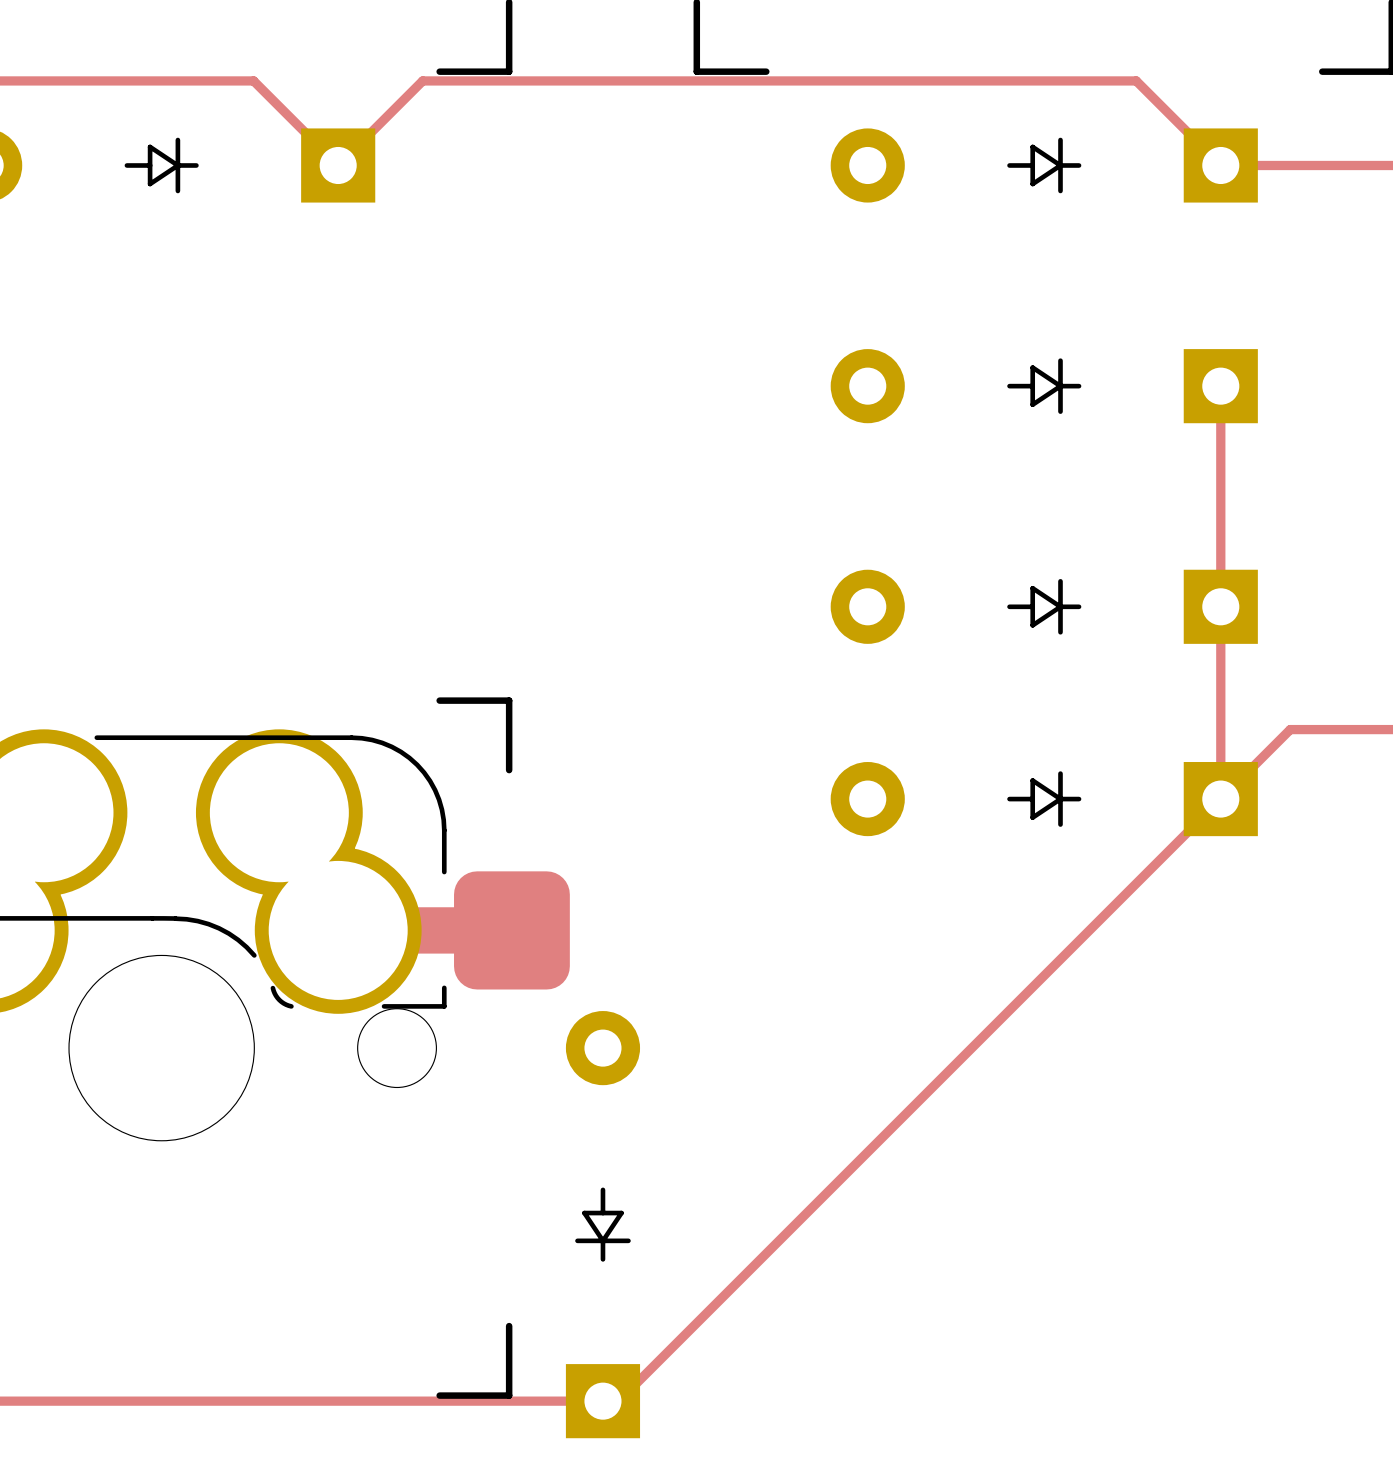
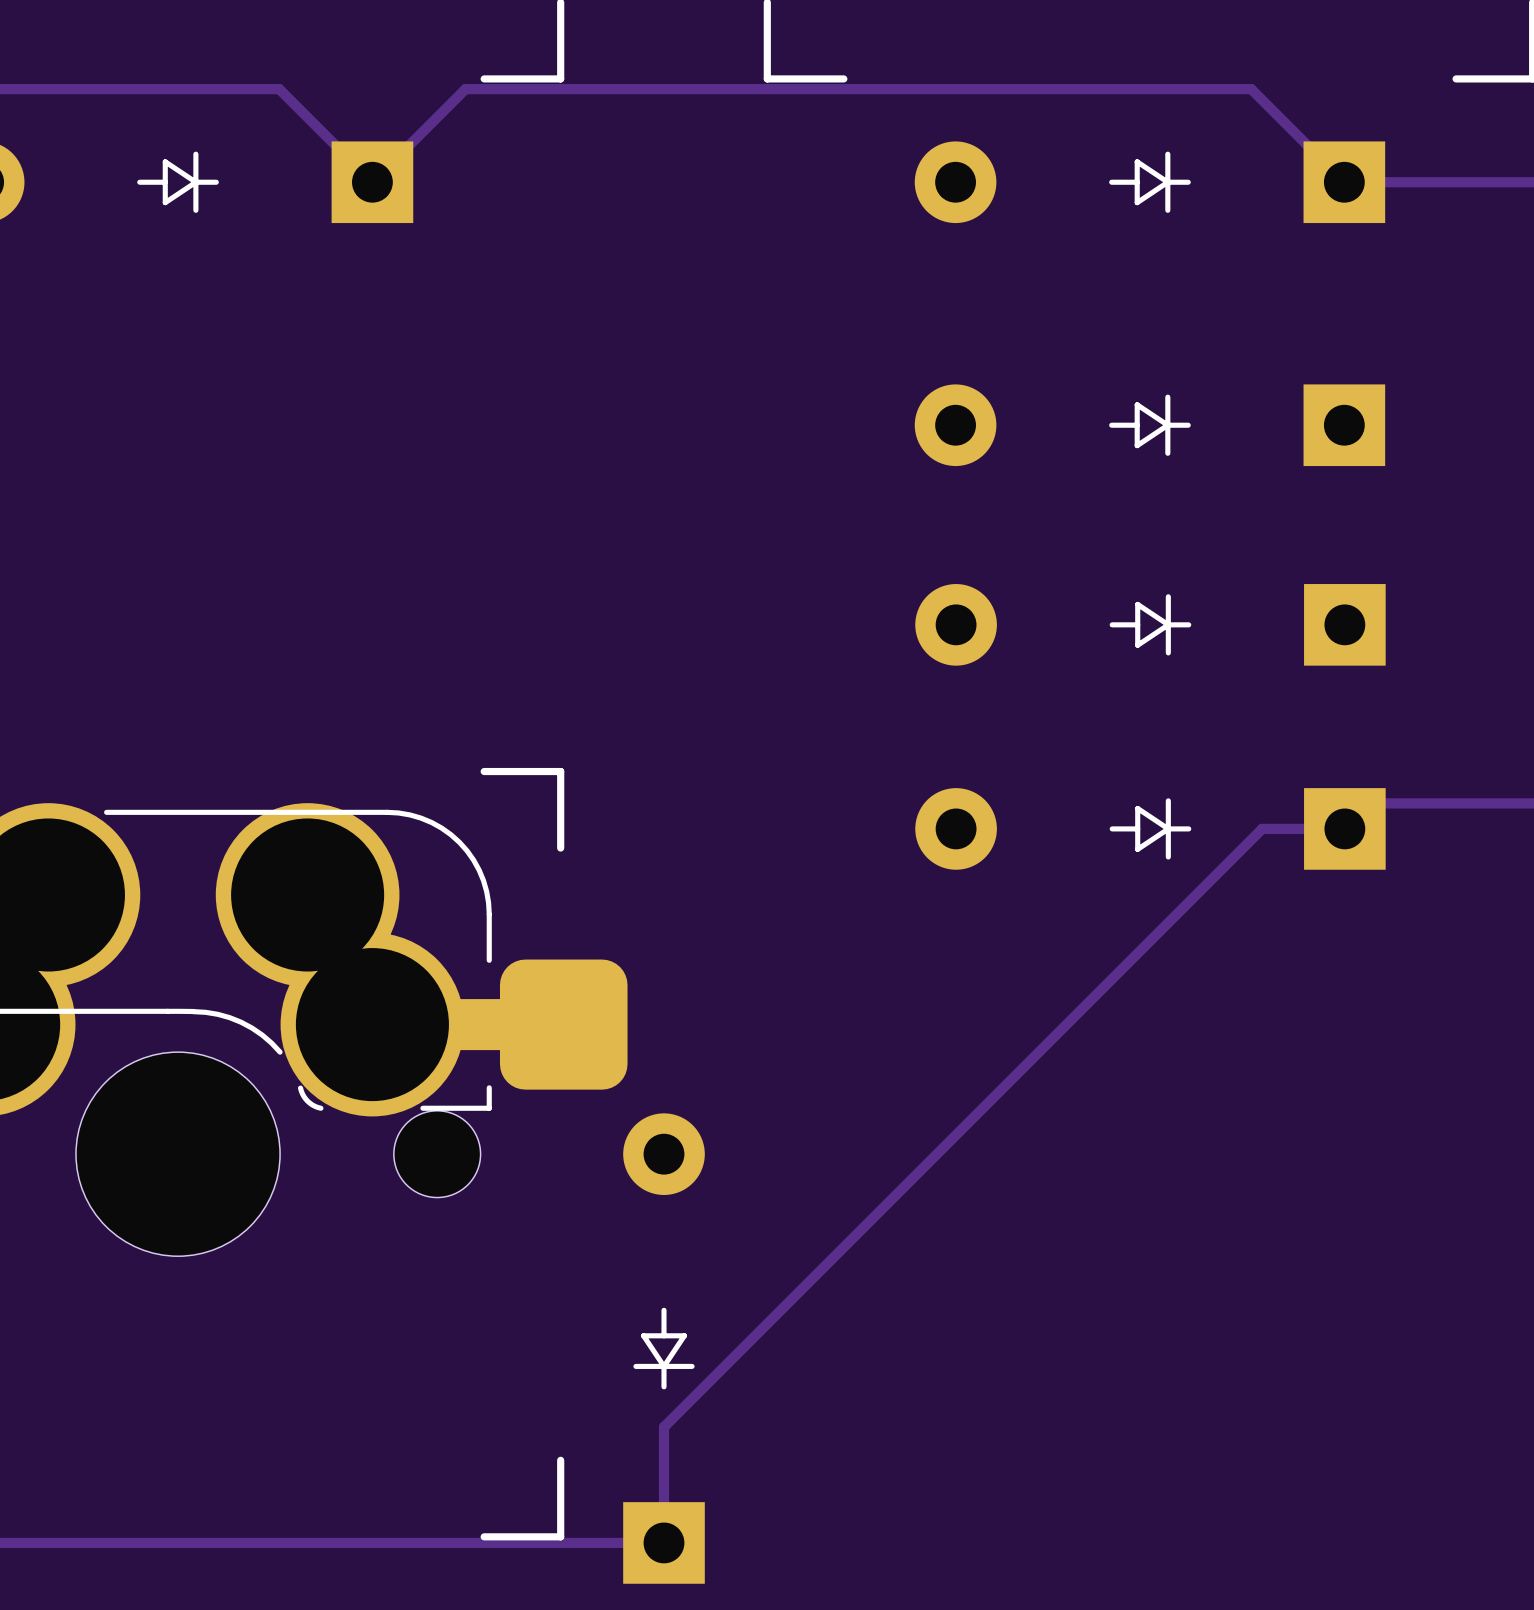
track: (1220, 386) (1220, 799) -> none
part position: (1044, 606) -> (1150, 624)
track: (1290, 729) (618, 1401) (602, 1401) -> (1420, 803) (1370, 803) (1344, 828) (1262, 828) (664, 1427) (664, 1542)
part position: (1044, 799) -> (1150, 828)

